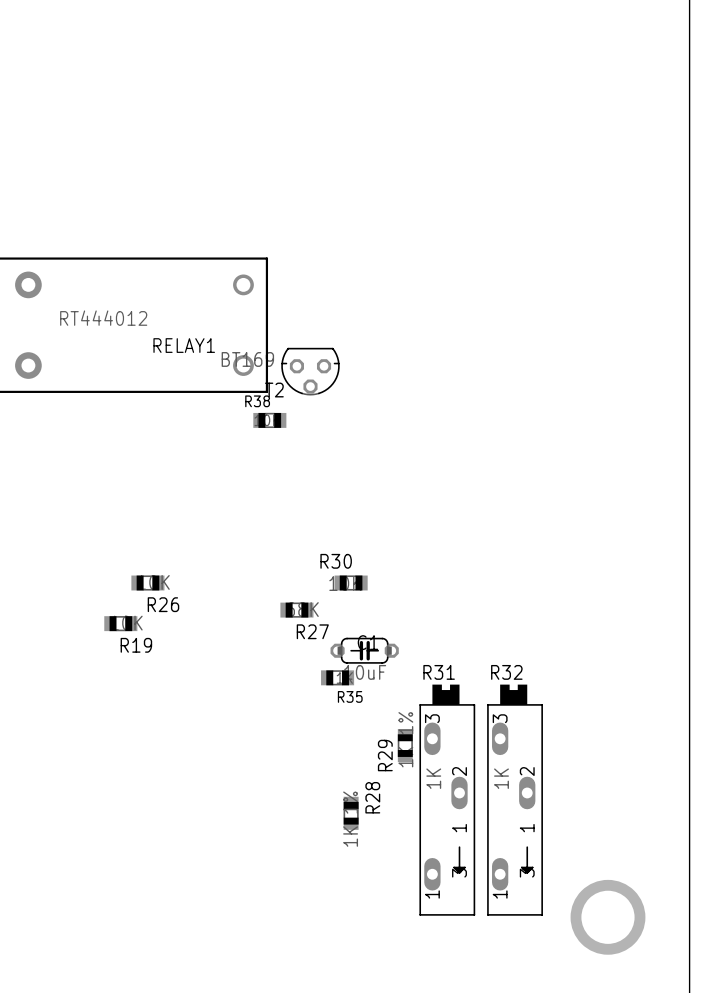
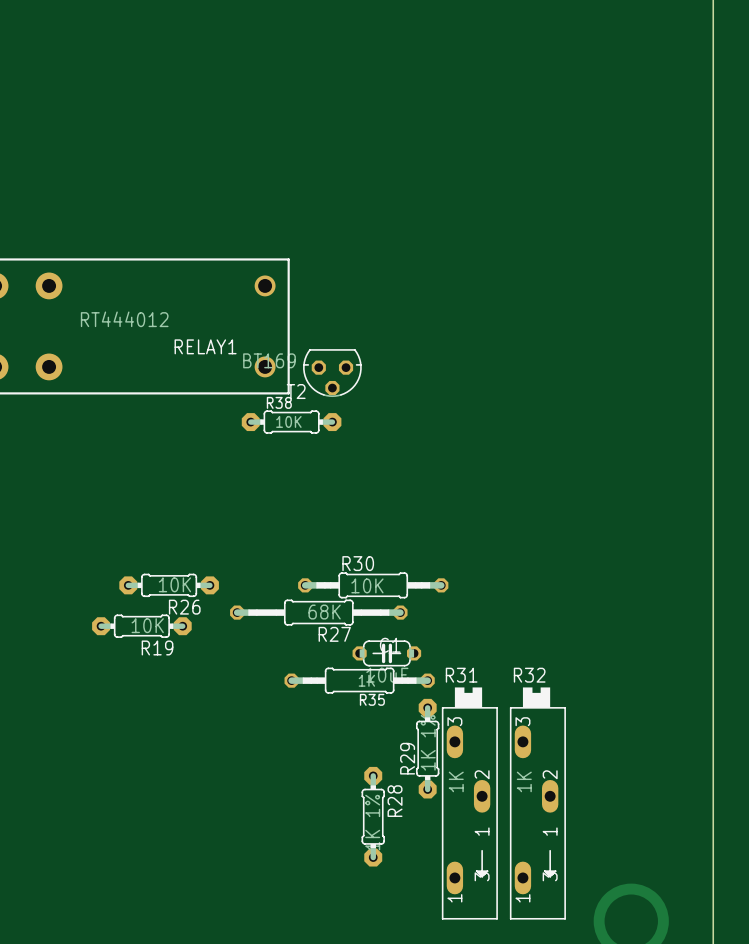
R38 footprint: [253, 412, 287, 429] -> [241, 410, 342, 434]
R26 footprint: [131, 575, 165, 591] -> [119, 573, 219, 598]
R30 footprint: [334, 575, 368, 591] -> [298, 572, 449, 599]
R27 footprint: [280, 602, 314, 618] -> [230, 599, 408, 626]
R19 footprint: [104, 616, 138, 632] -> [92, 614, 192, 638]
R35 footprint: [321, 670, 355, 686] -> [284, 667, 435, 694]
R29 footprint: [397, 729, 413, 763] -> [415, 698, 440, 799]
R28 footprint: [343, 796, 359, 830] -> [361, 766, 385, 867]

